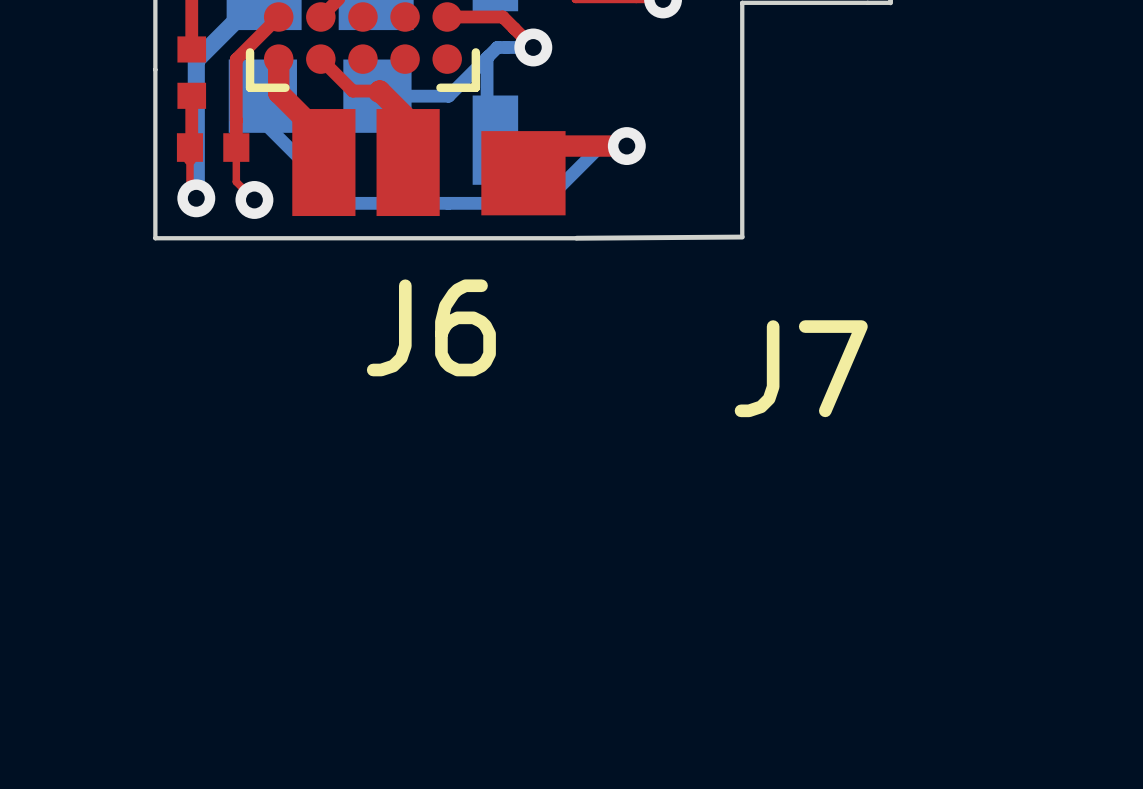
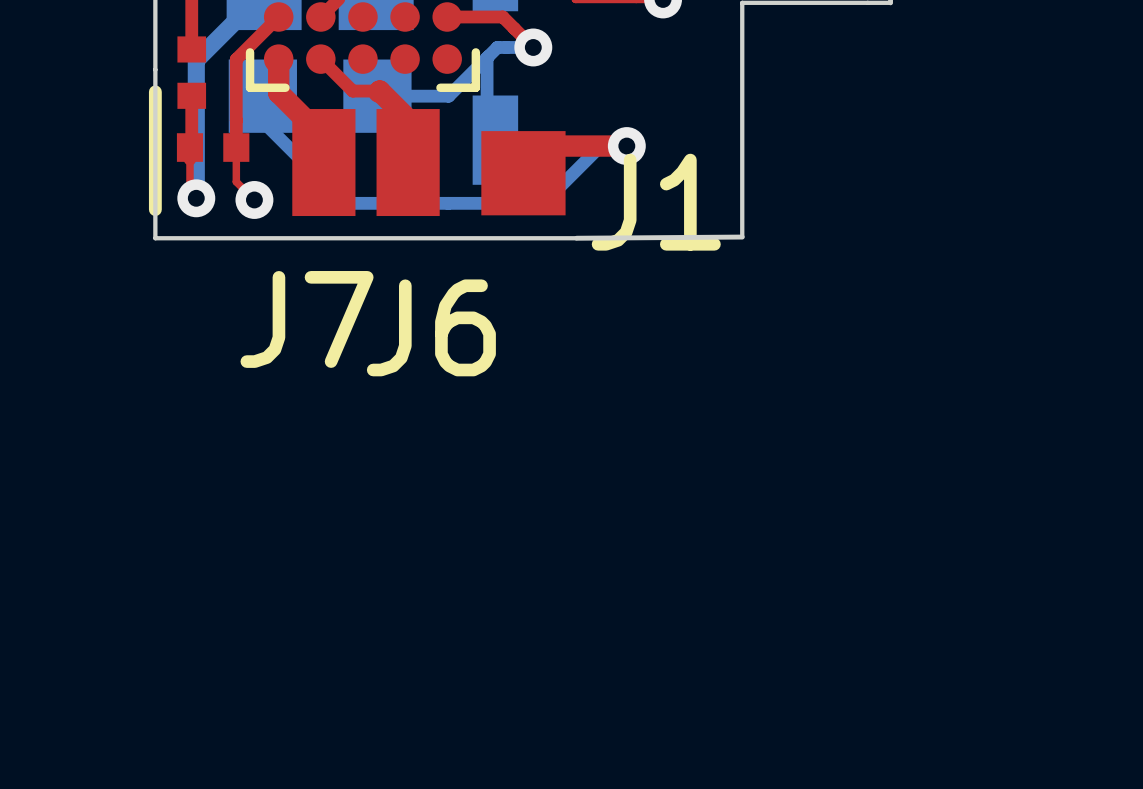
line: none -> (155, 91) (155, 209)
J1 name: none -> J1 (656, 202)
J7 name position: J7 (801, 368) -> J7 (307, 319)

